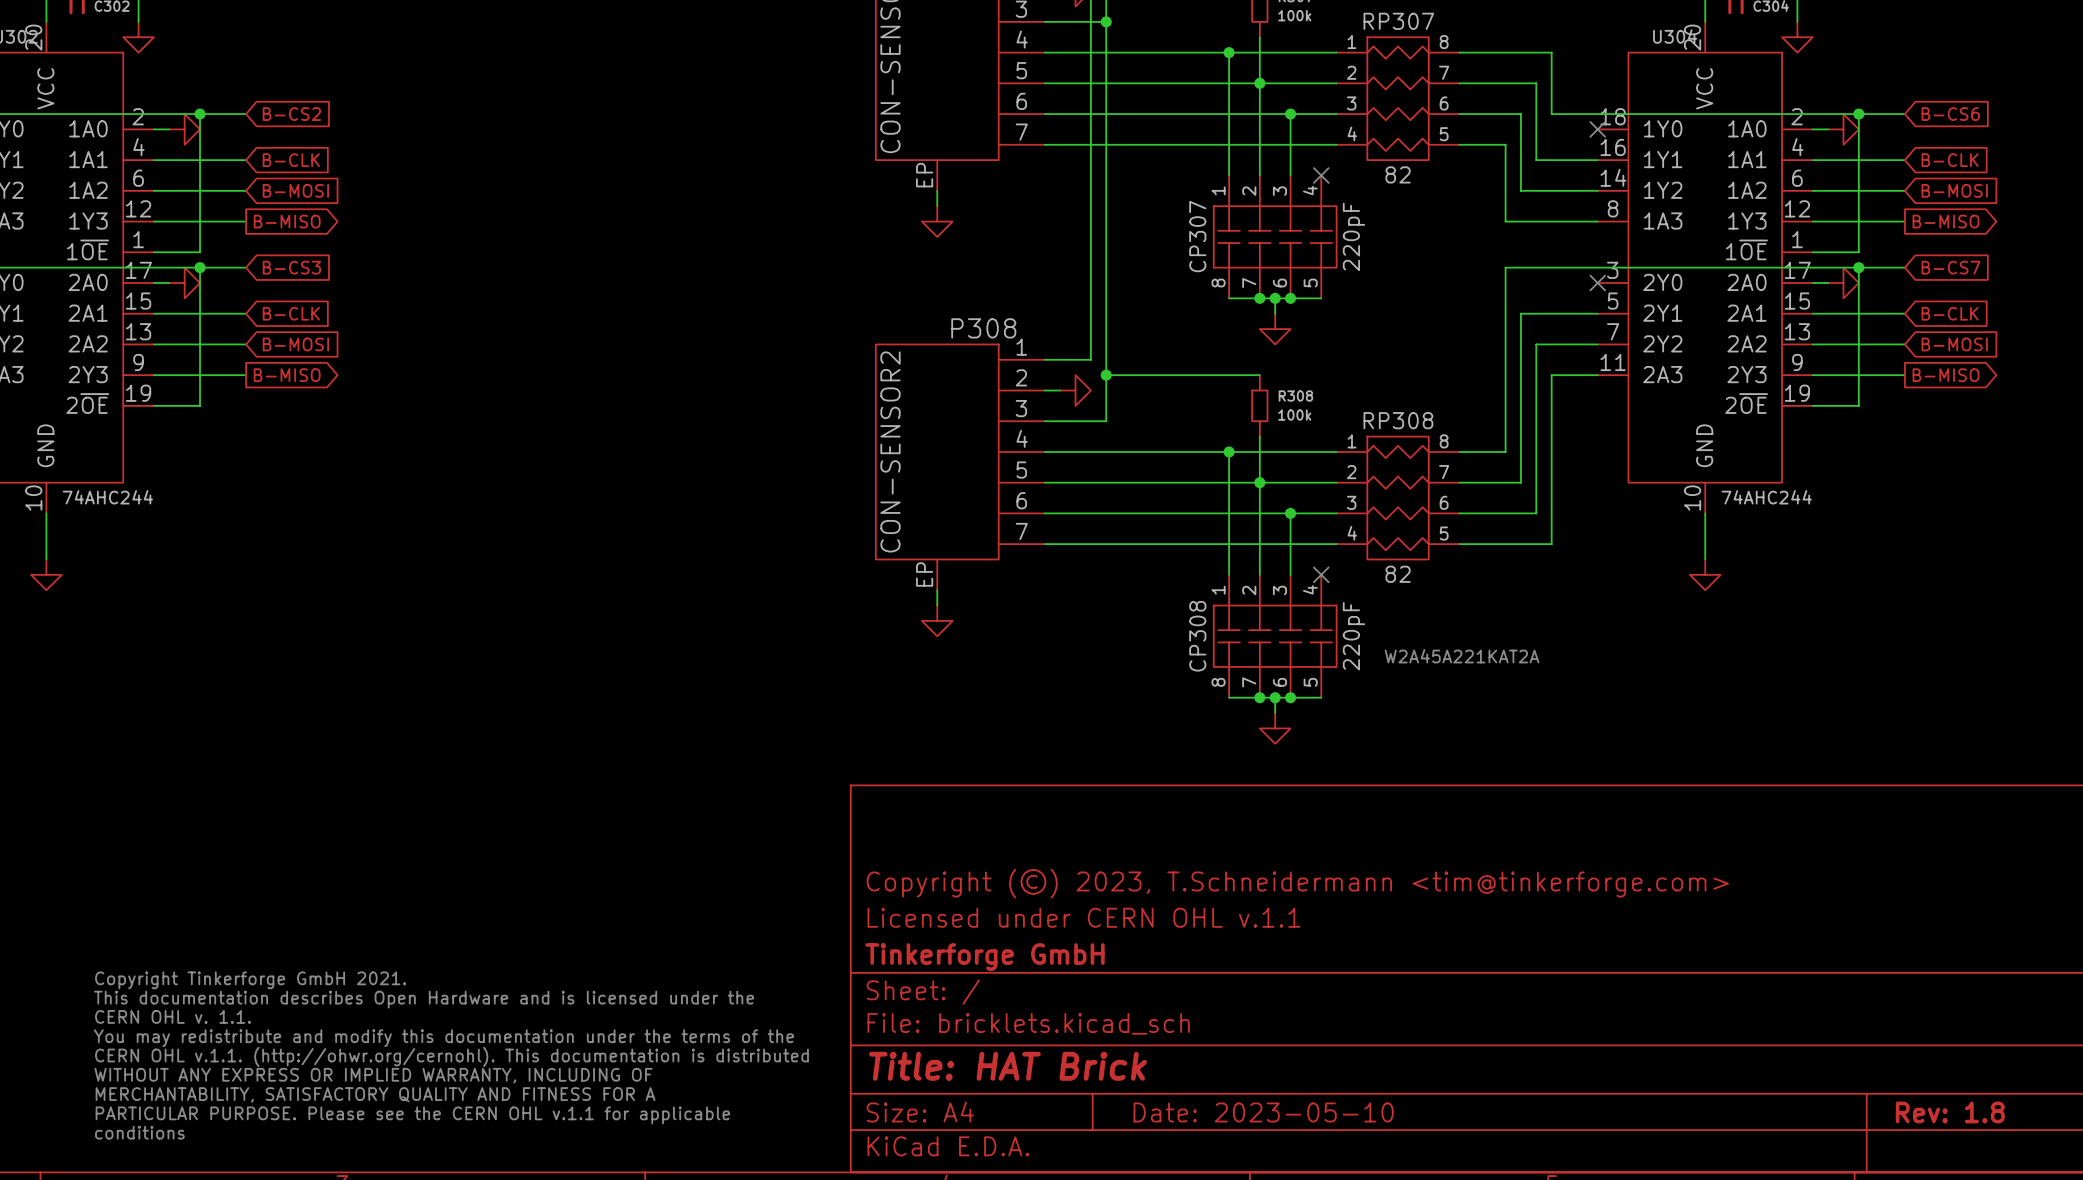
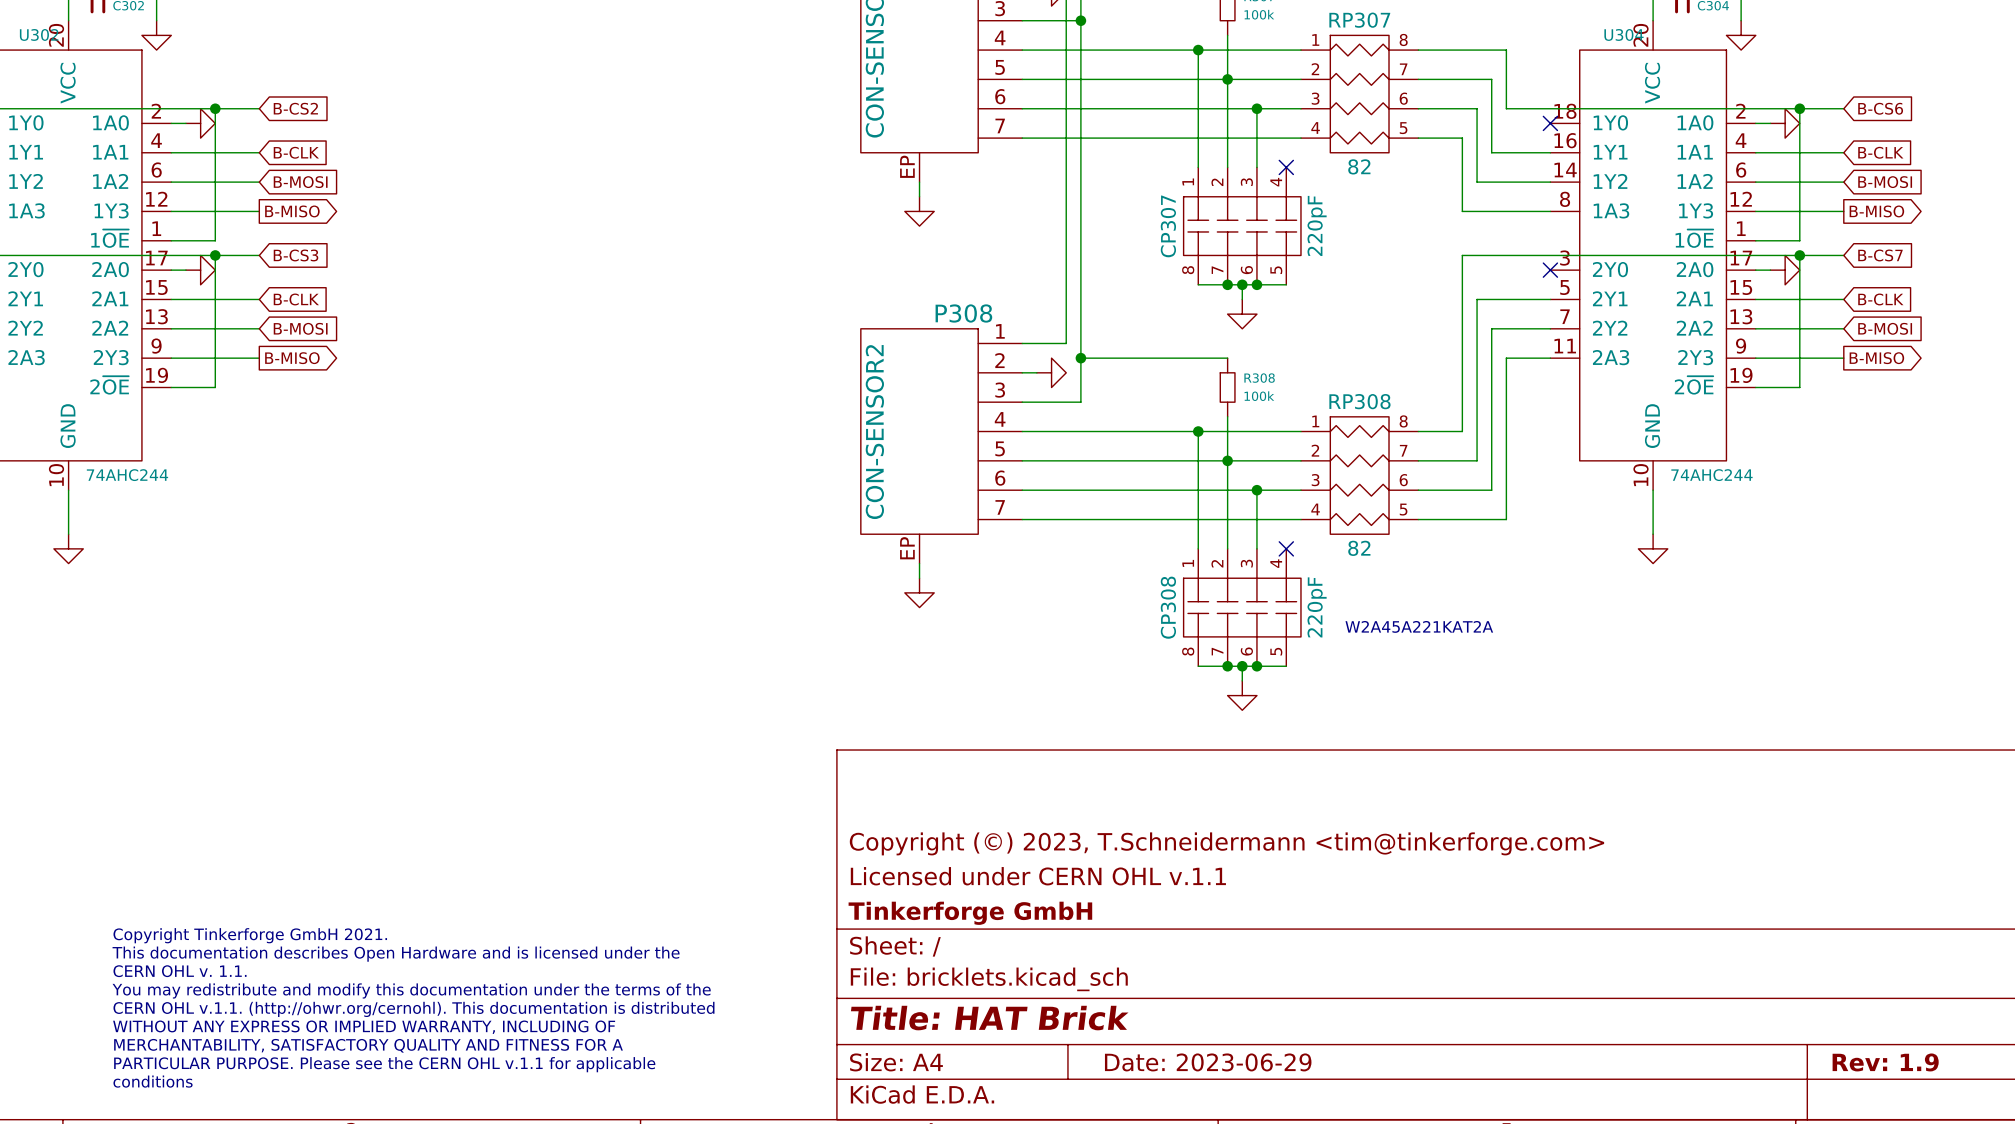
title block: Date: 2023-05-10 (1263, 1112) -> Date: 2023-06-29 (1208, 1062)
title block: Rev: 1.8 (1950, 1112) -> Rev: 1.9 (1885, 1062)

